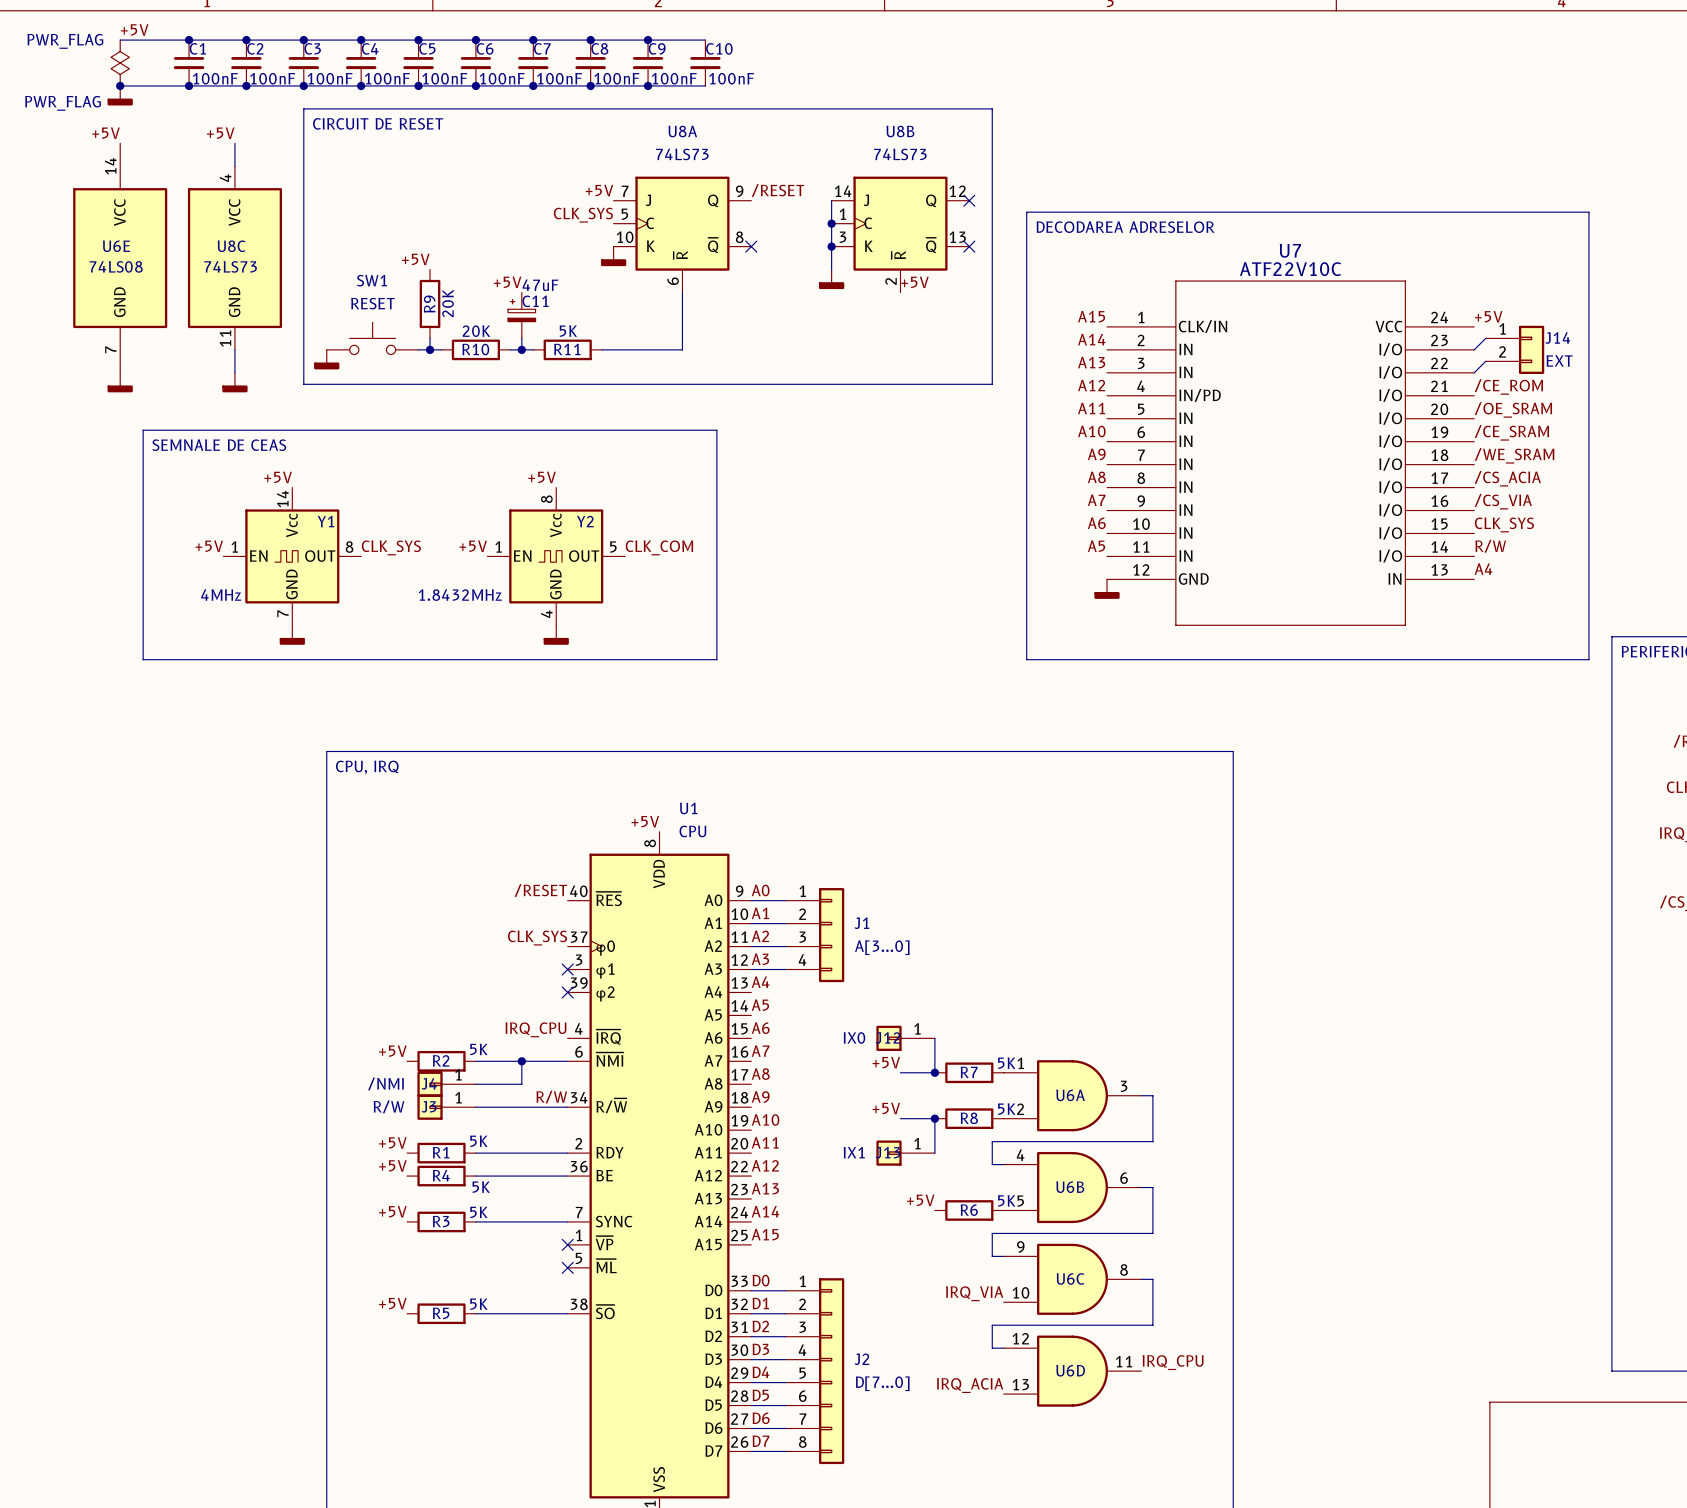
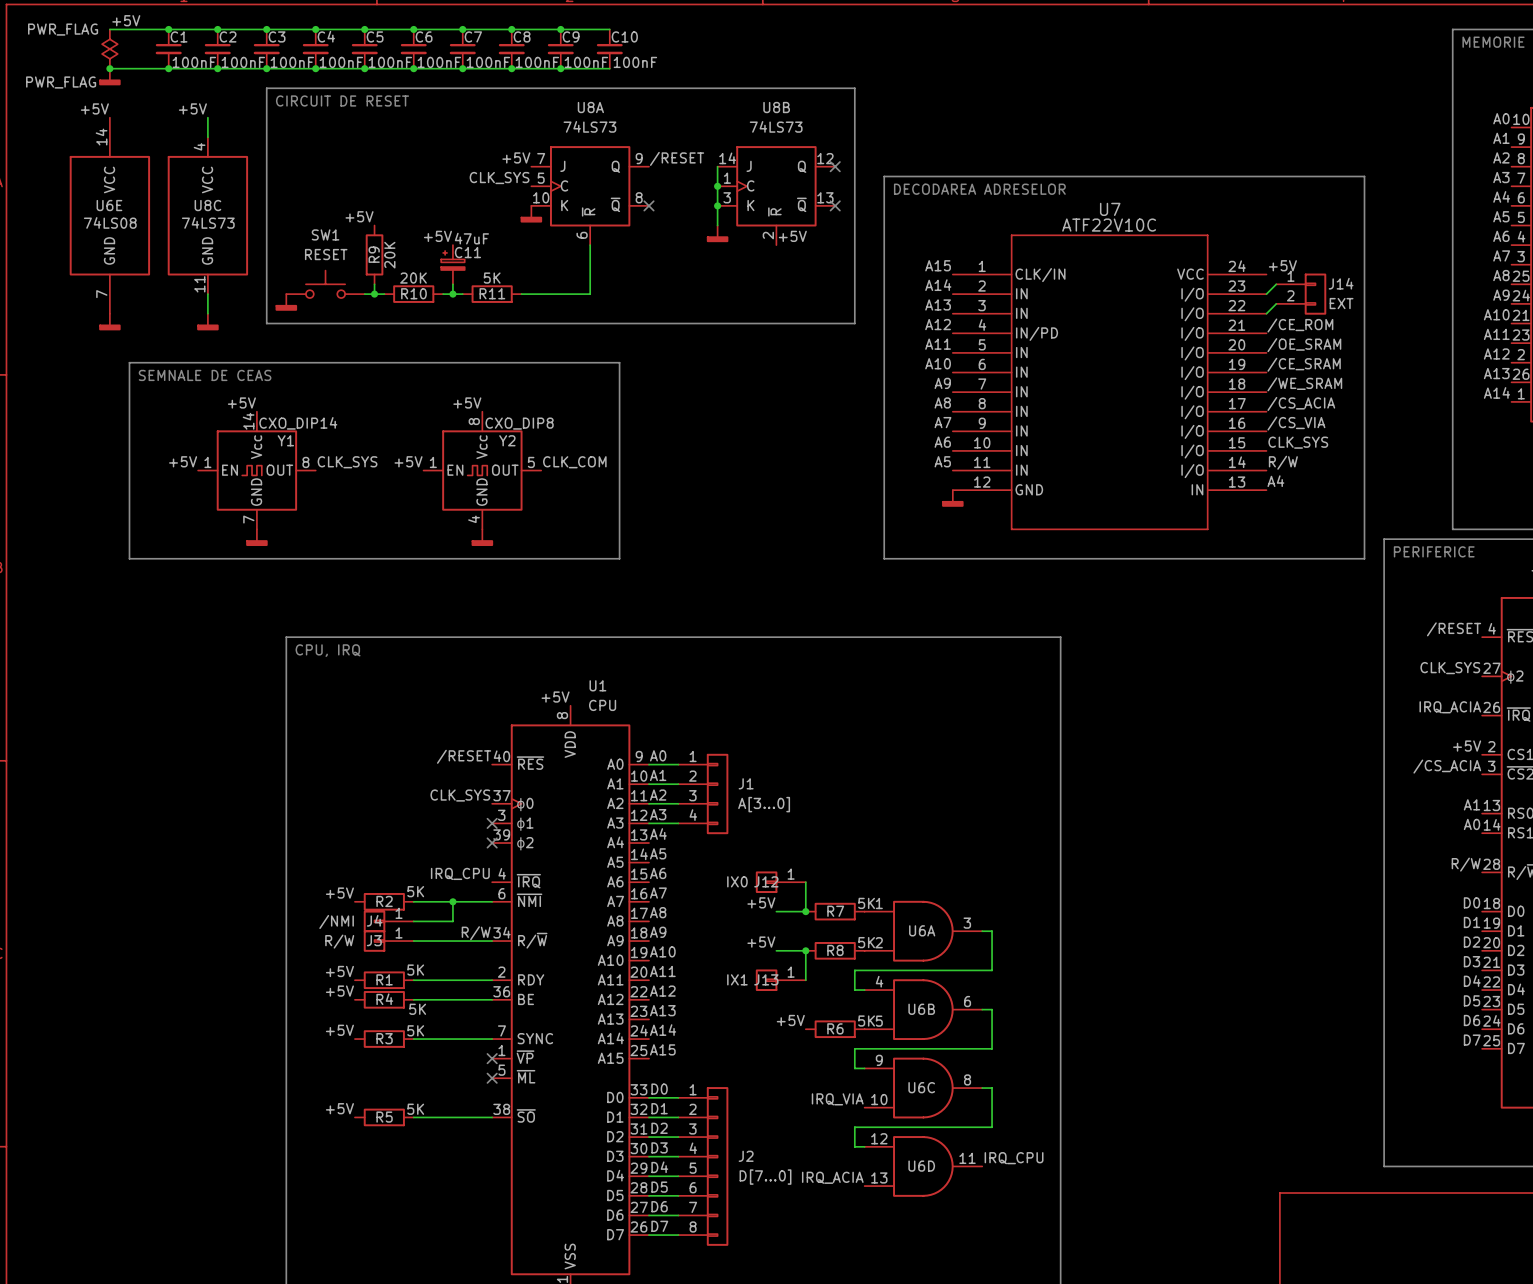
Y1 value: 4MHz (221, 595) -> CXO_DIP14 (298, 423)
Y2 value: 1.8432MHz (460, 595) -> CXO_DIP8 (519, 423)

